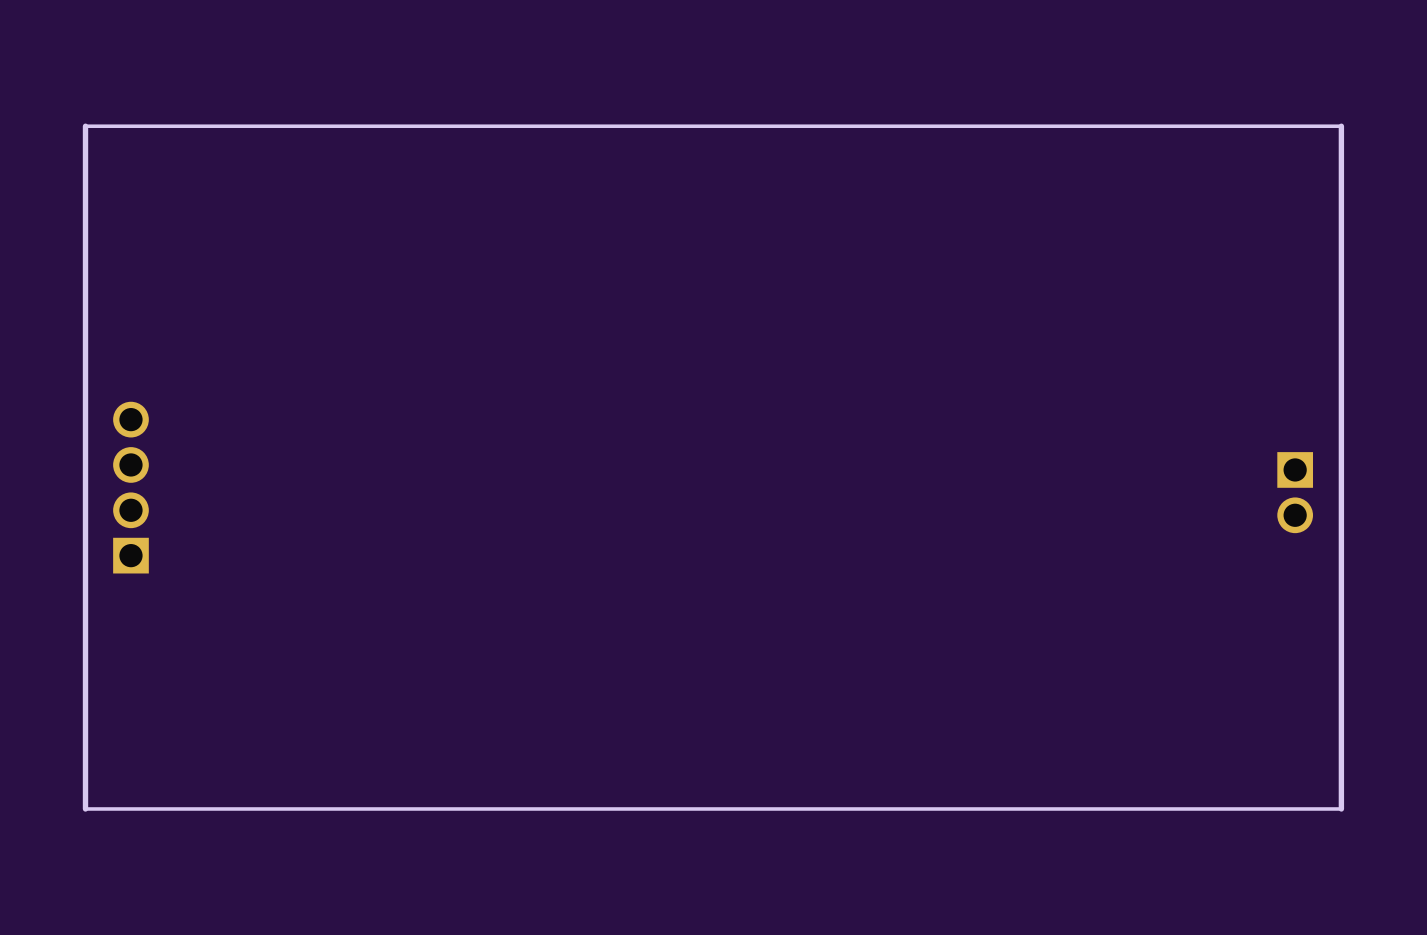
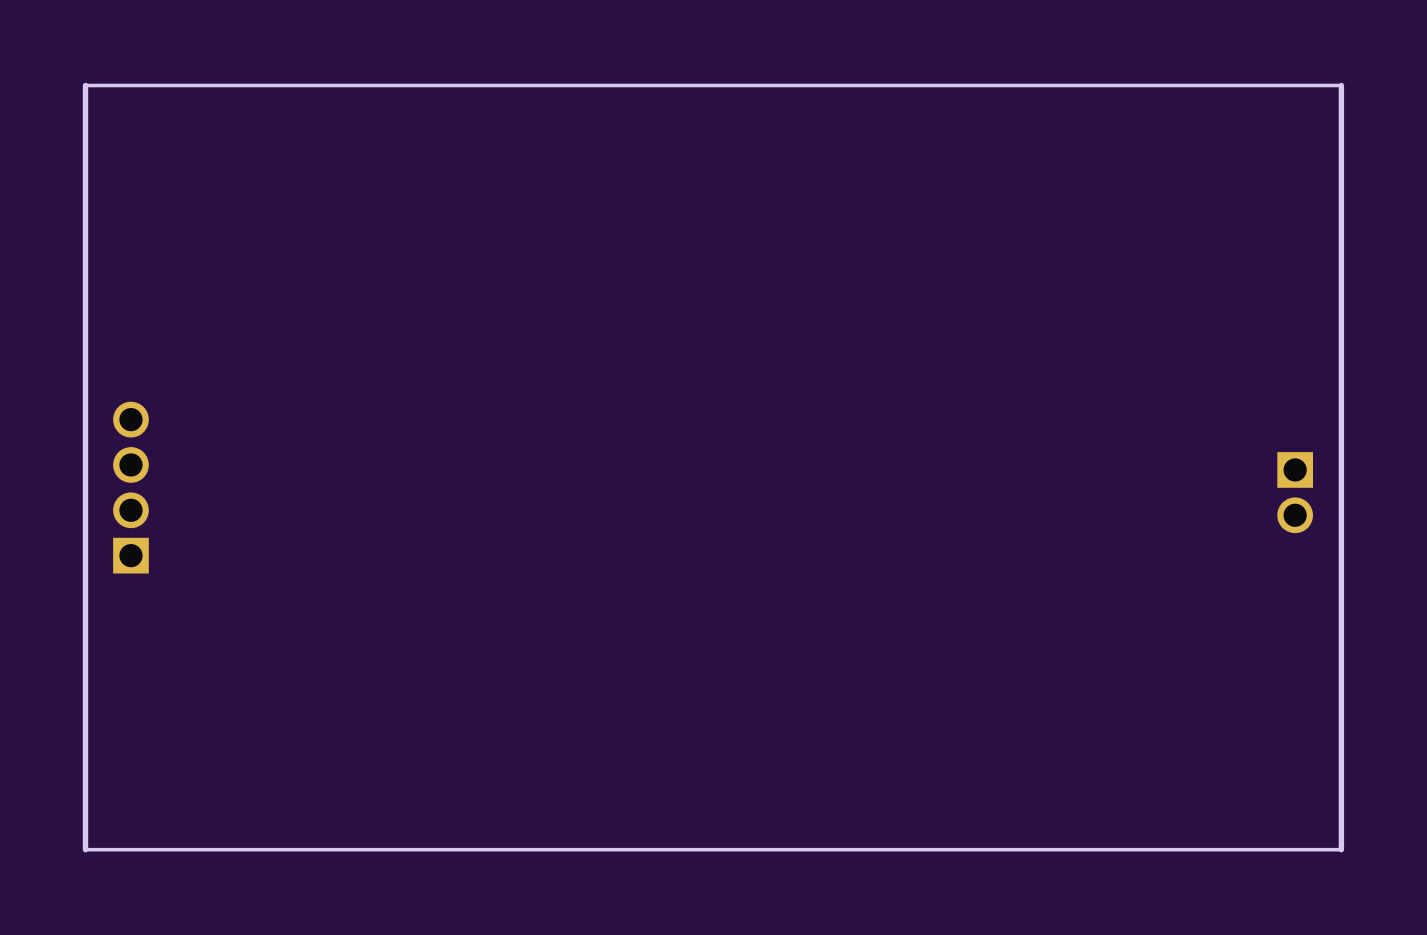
board edge: (85, 126) (1341, 126) -> (85, 126) (85, 85) (1341, 85) (1341, 126)
board edge: (85, 808) (1341, 808) -> (85, 808) (85, 849) (1341, 849) (1341, 808)

